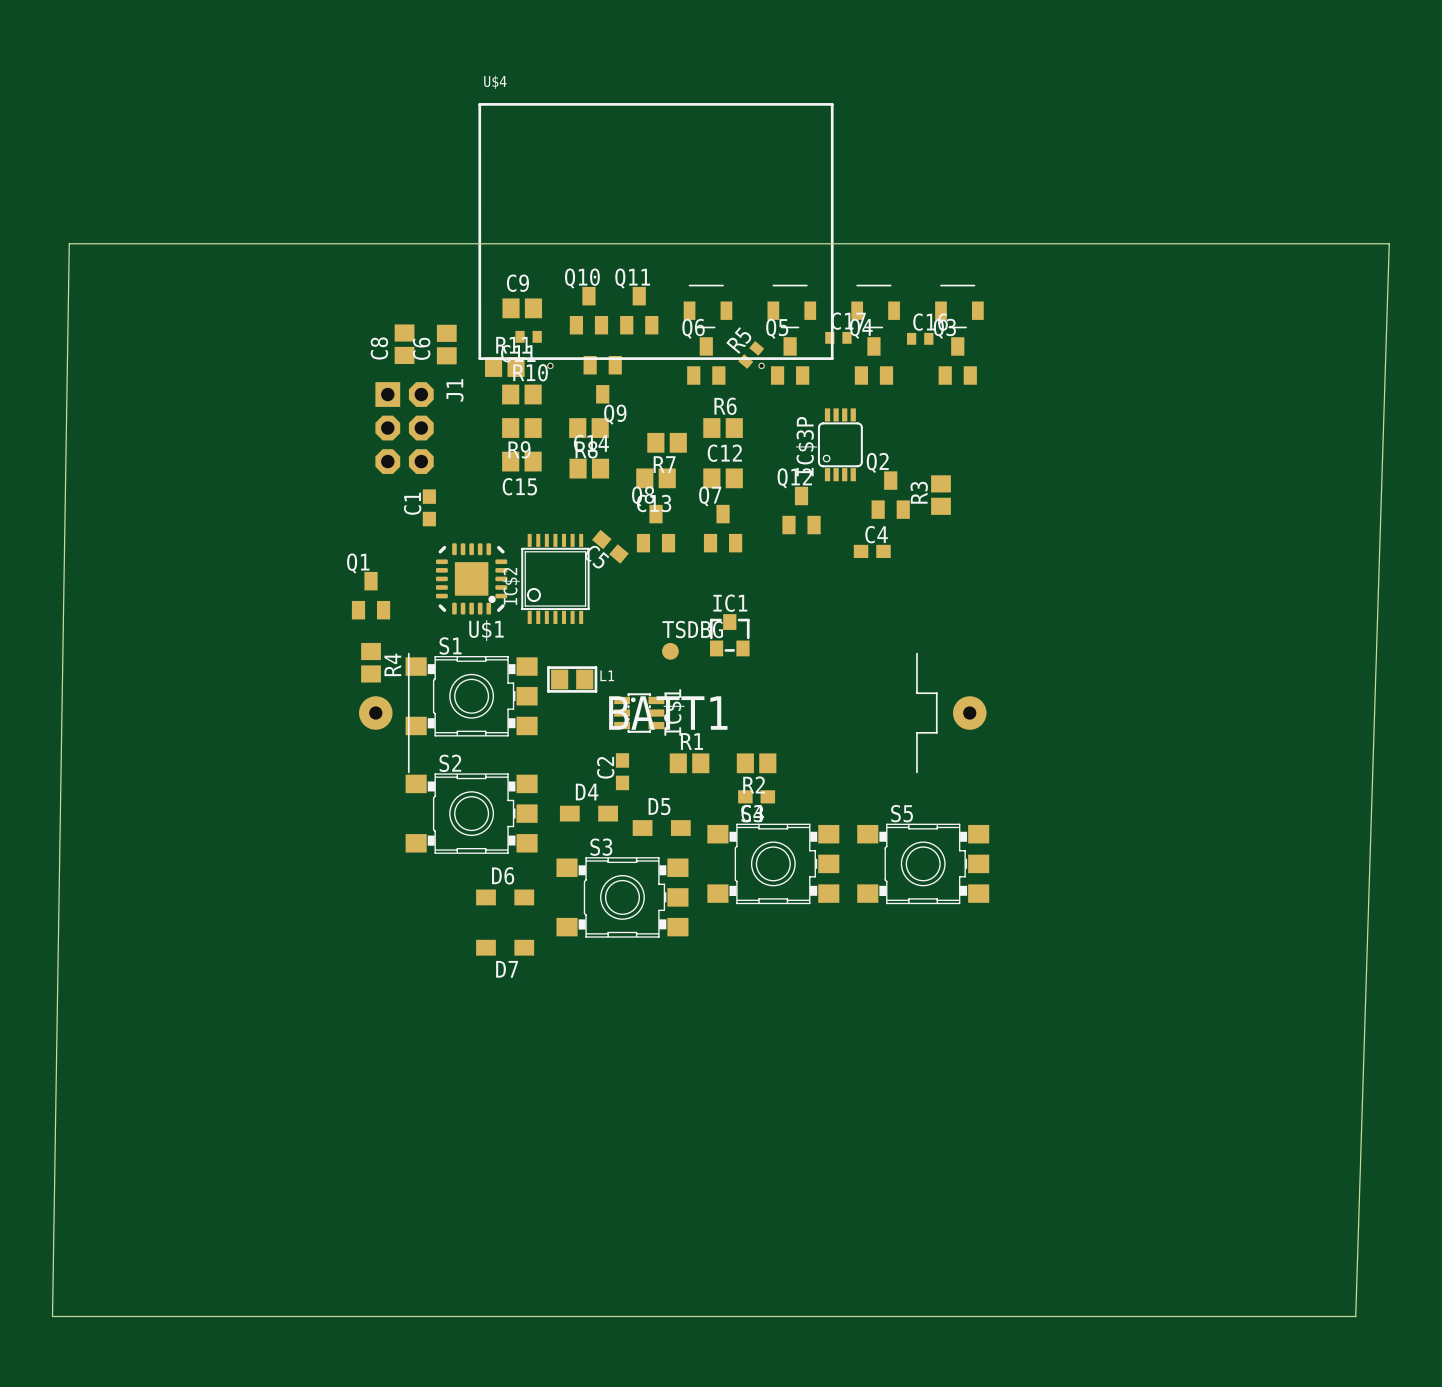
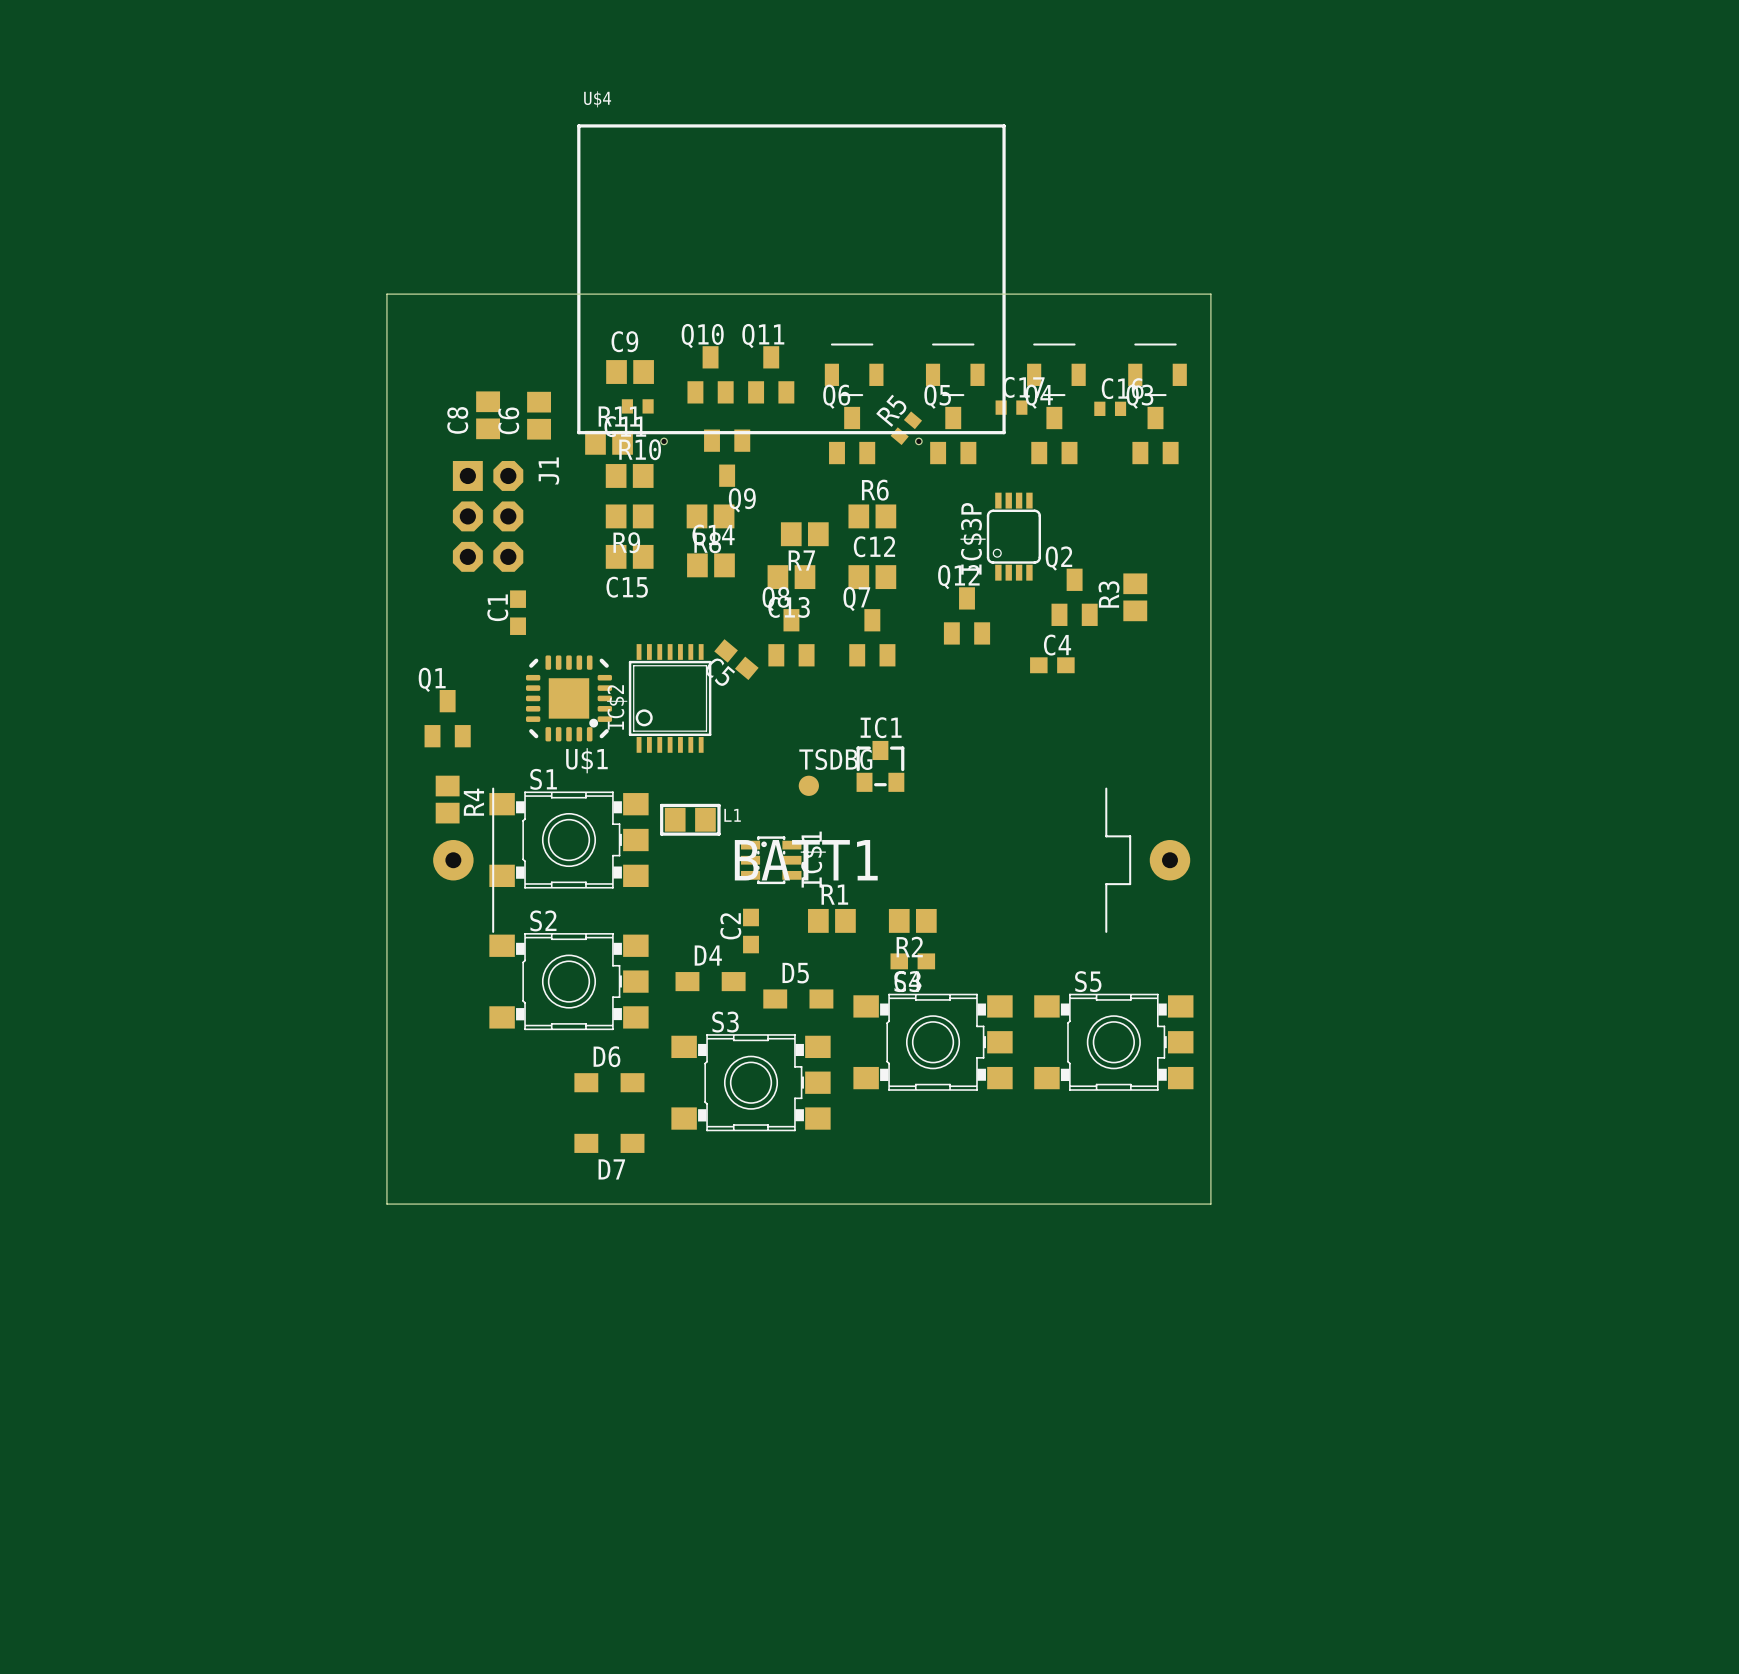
board edge: (320, 243) (69, 243) (52, 1316) (1355, 1316) (1389, 243) (1003, 243) -> (386, 294) (386, 1204) (1210, 1204) (1210, 294)

